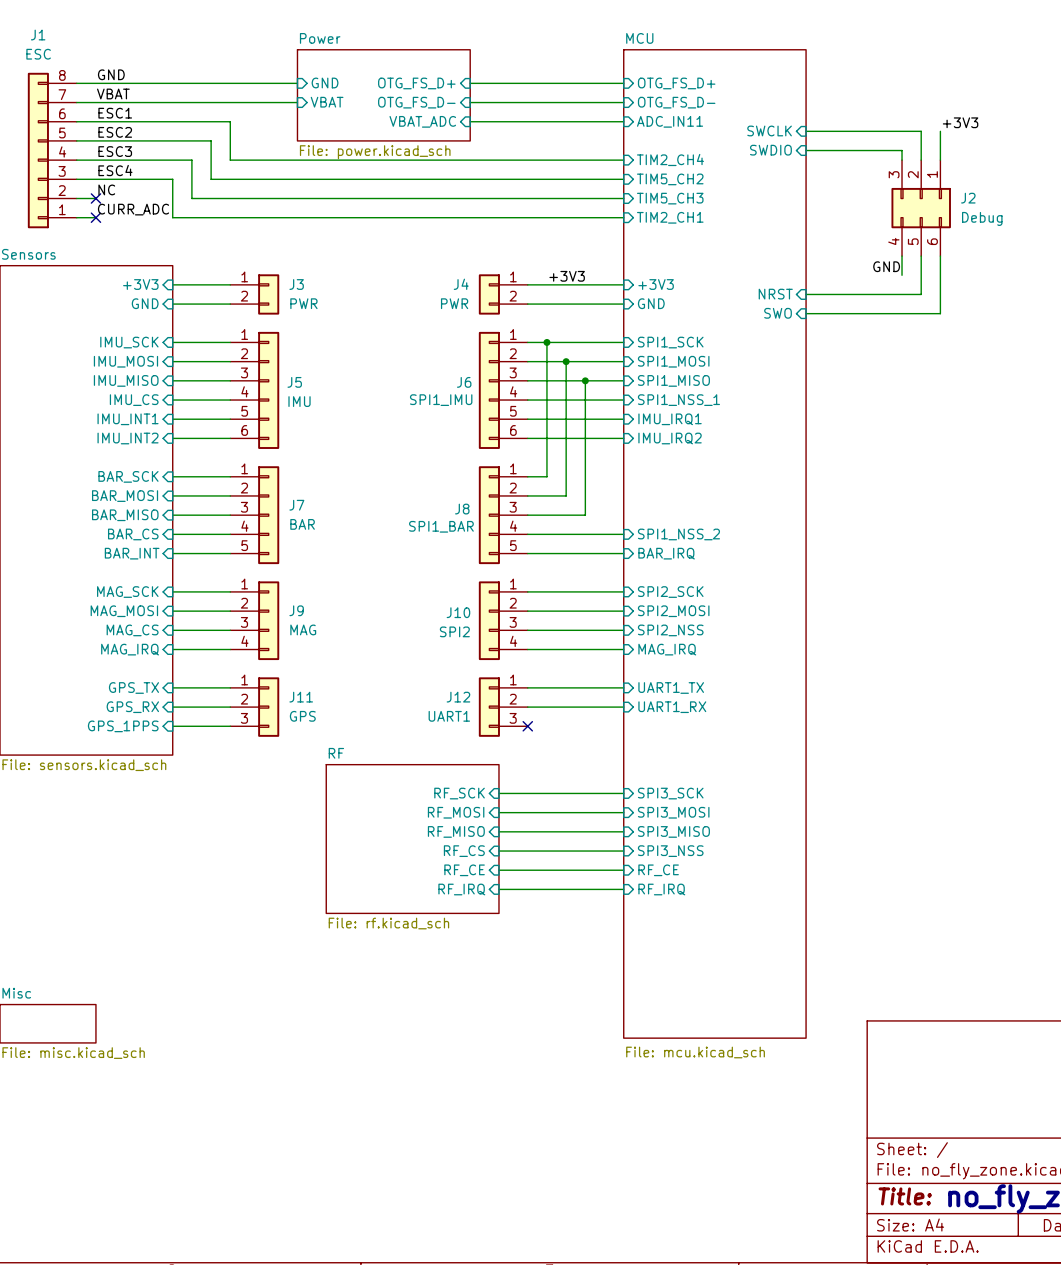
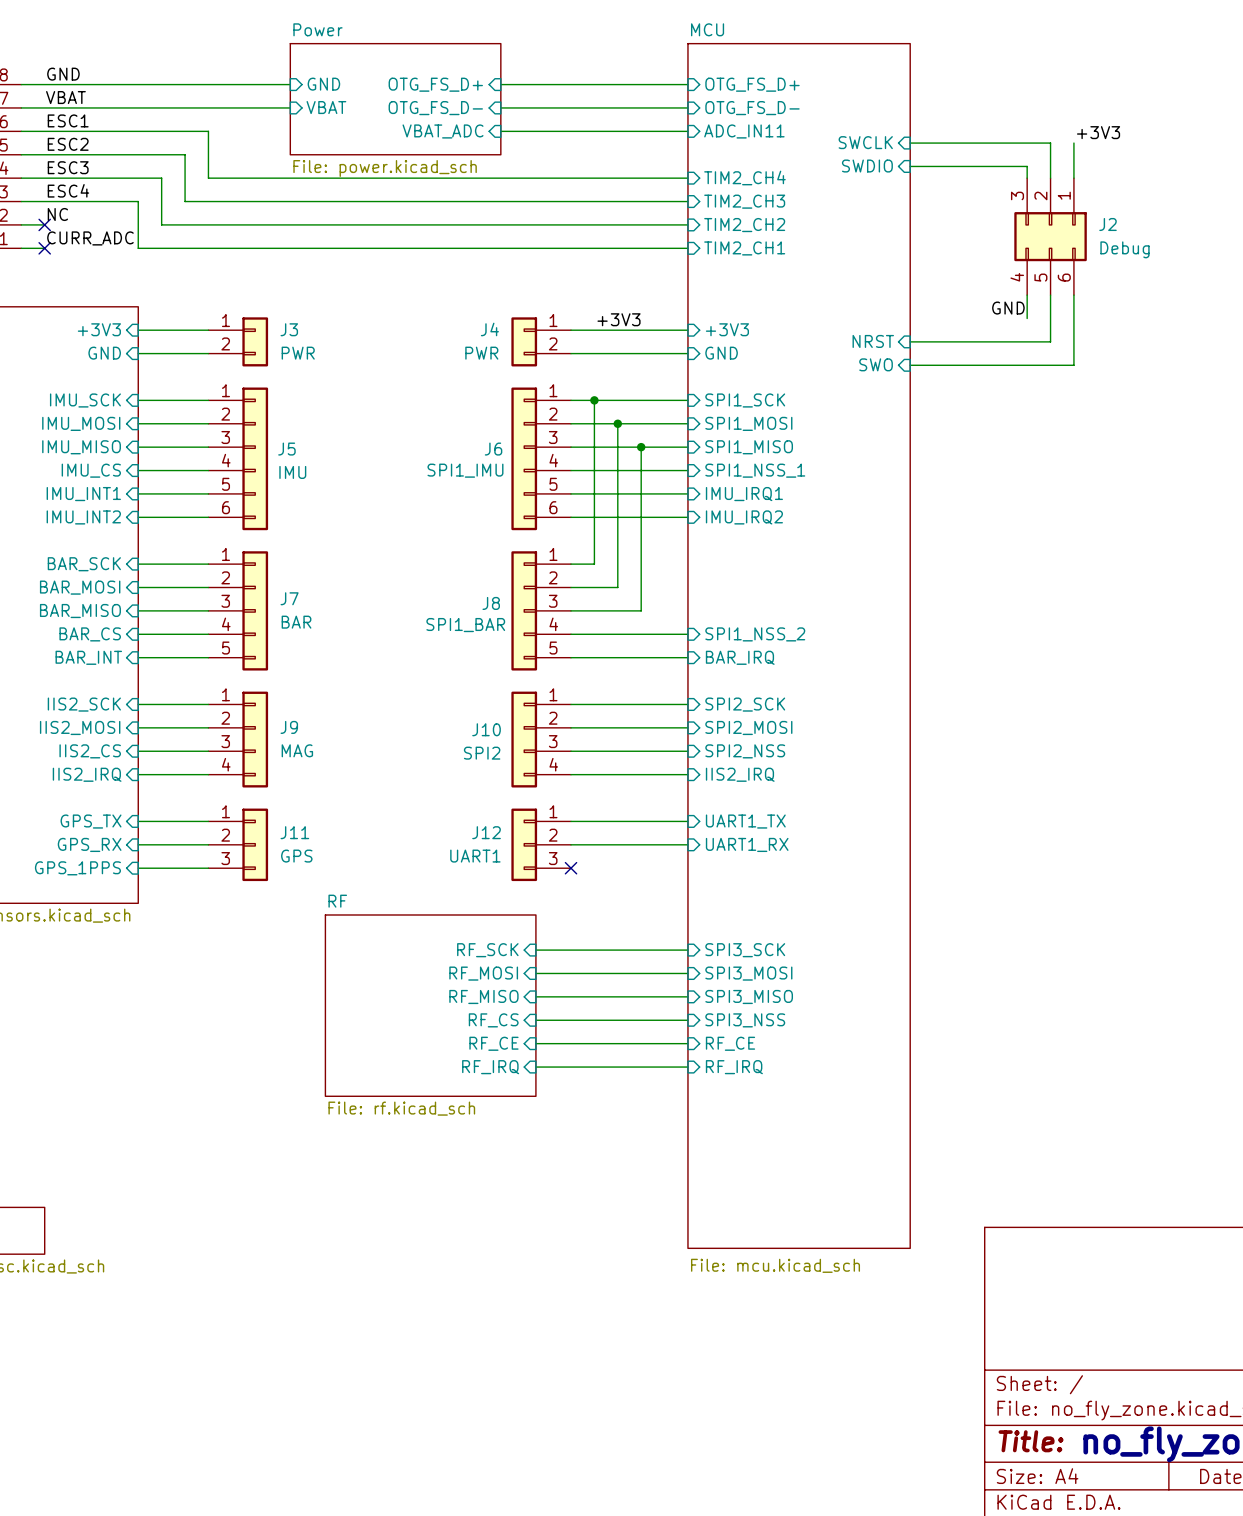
sheet pin: TIM5_CH2 (670, 179) -> TIM2_CH3 (744, 201)
sheet pin: TIM5_CH3 (670, 198) -> TIM2_CH2 (744, 225)
sheet pin: MAG_SCK (127, 592) -> IIS2_SCK (84, 704)
sheet pin: MAG_MOSI (124, 611) -> IIS2_MOSI (80, 727)
sheet pin: MAG_CS (132, 630) -> IIS2_CS (90, 751)
sheet pin: MAG_IRQ (130, 649) -> IIS2_IRQ (87, 774)
sheet pin: MAG_IRQ (667, 649) -> IIS2_IRQ (740, 774)

